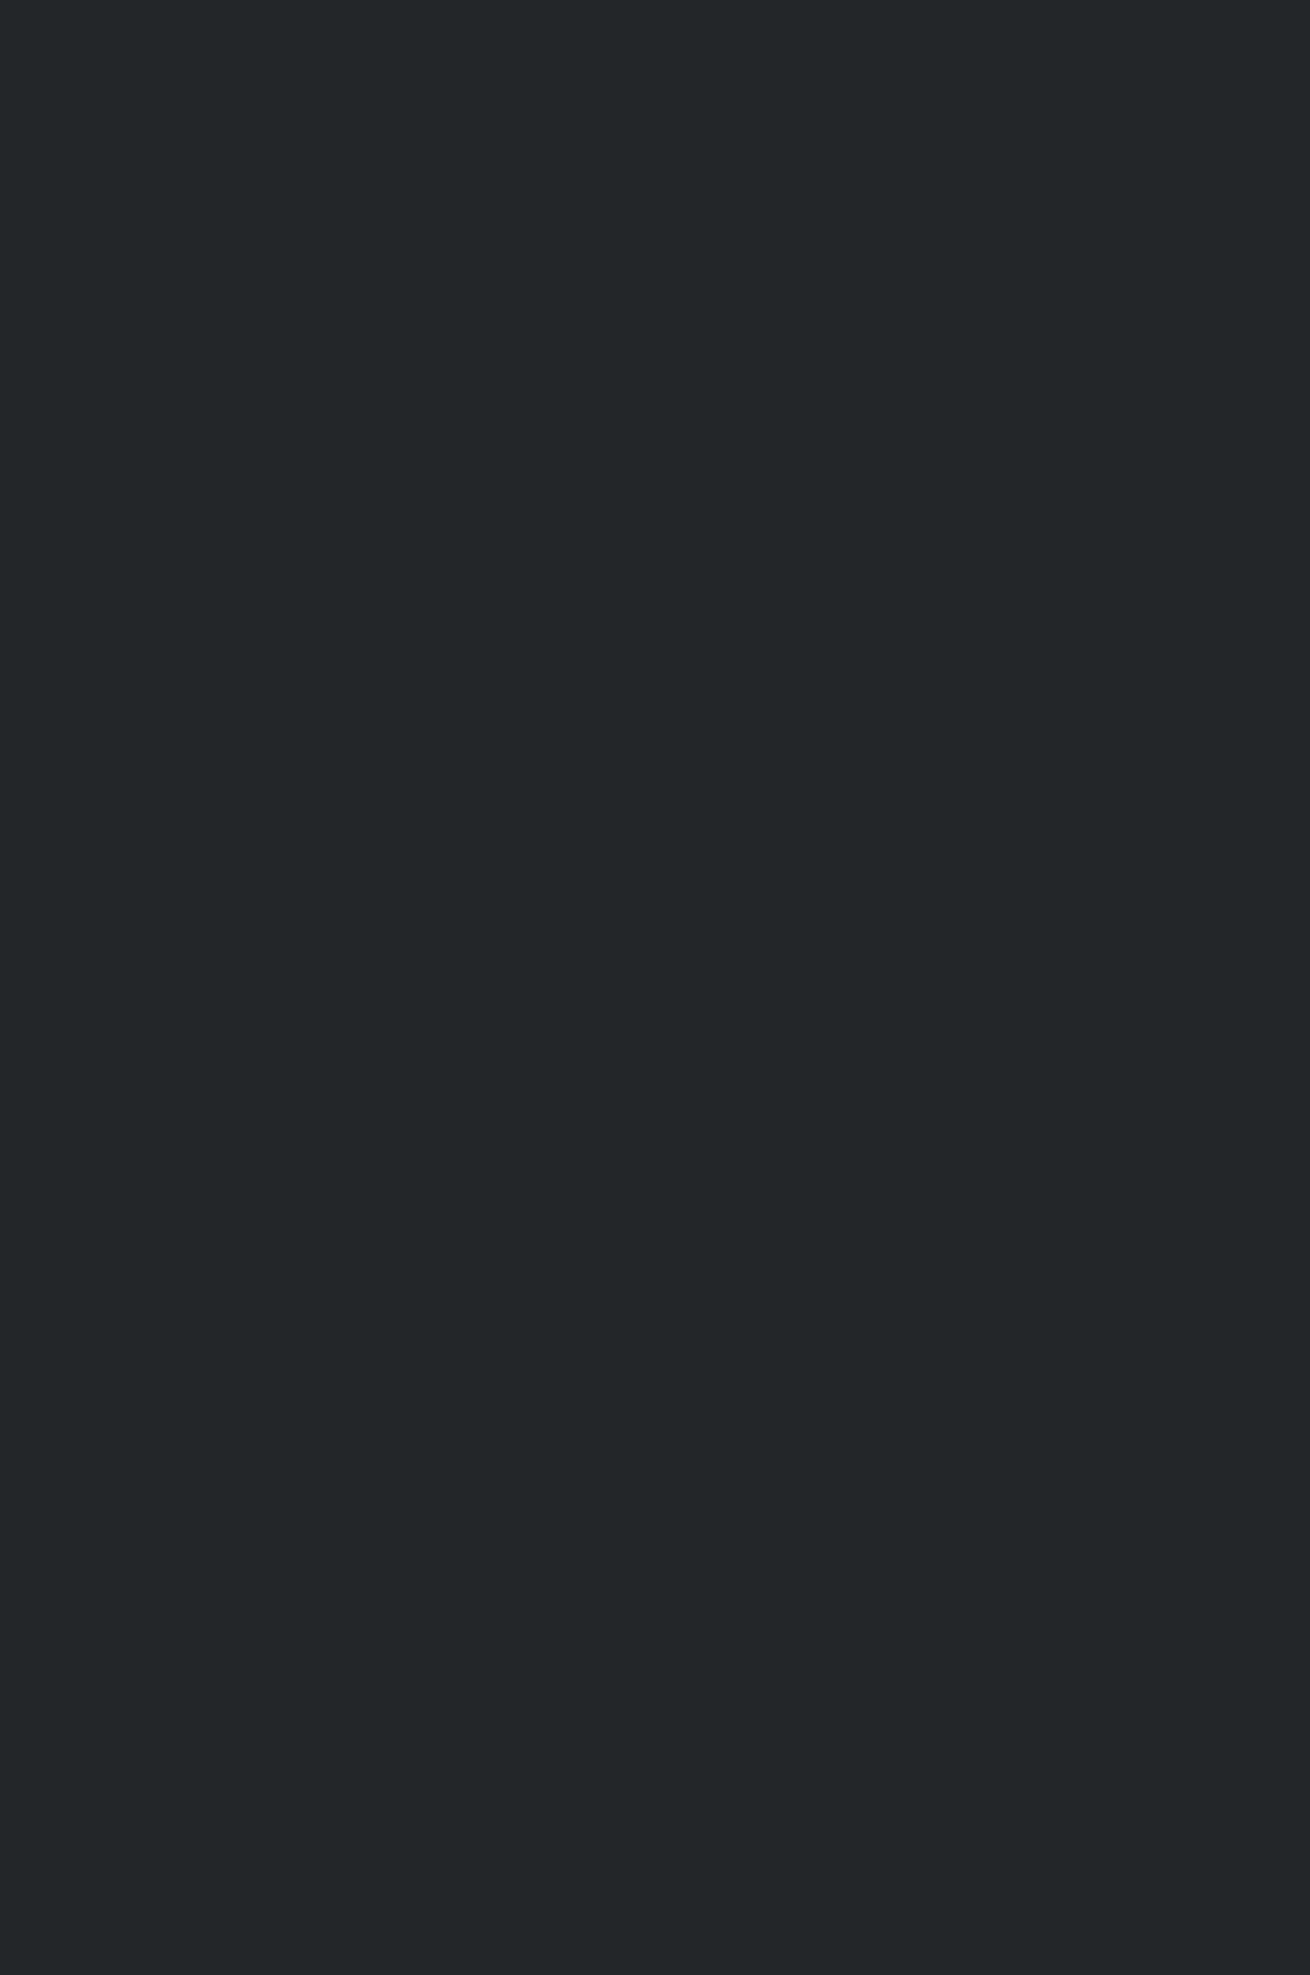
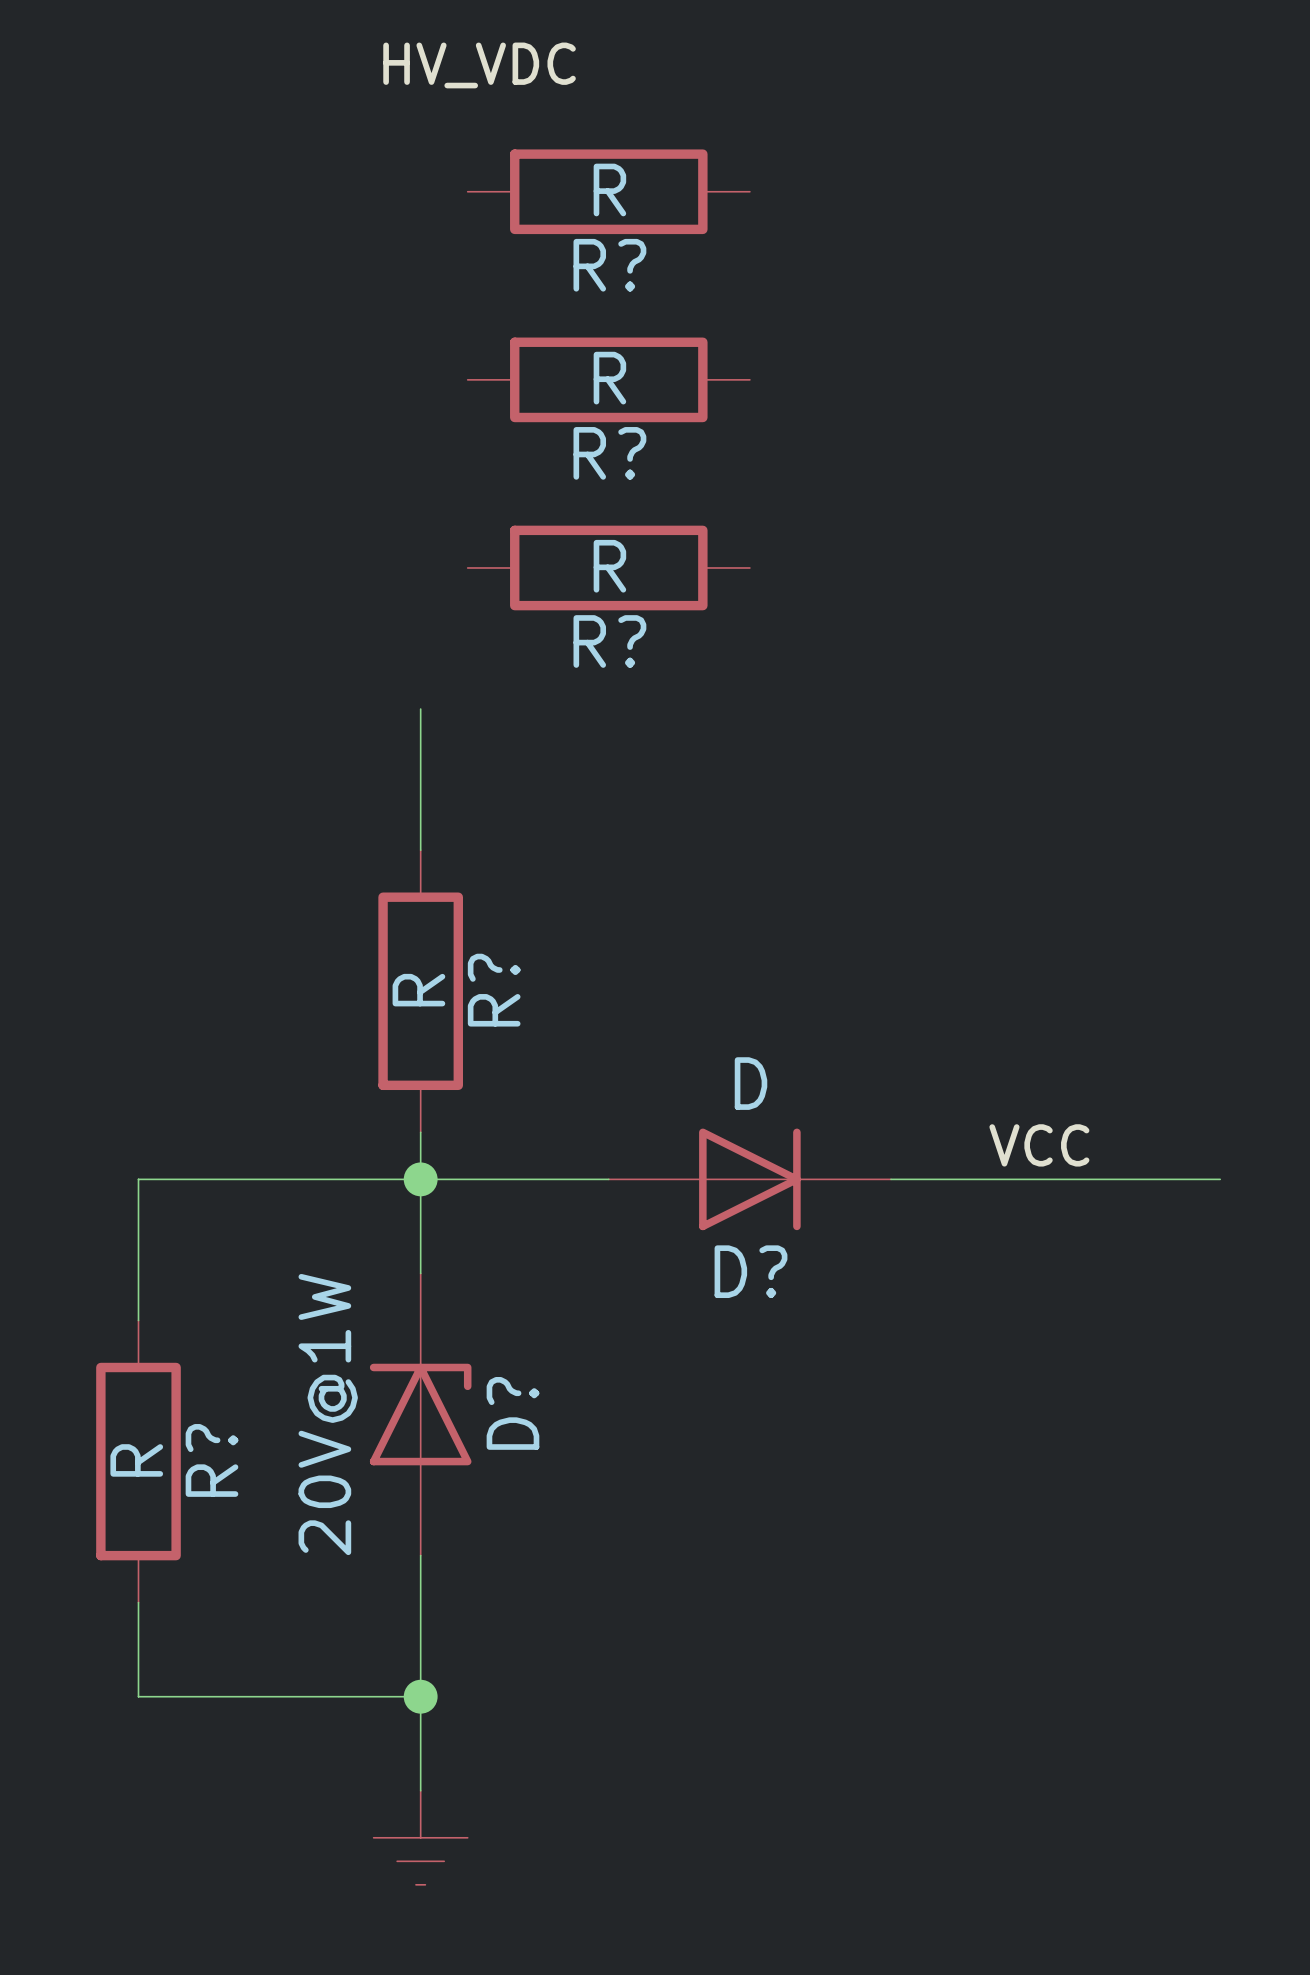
label: none -> HV_VDC (479, 65)
R?: none -> R (608, 191)
R?: none -> R (608, 379)
R?: none -> R (608, 567)
wire: none -> (420, 709) (420, 850)
R?: none -> R (420, 991)
wire: none -> (420, 1132) (420, 1273)
label: none -> VCC (1039, 1145)
junction: none -> (420, 1179)
wire: none -> (608, 1179) (138, 1179) (138, 1320)
D?: none -> D (749, 1179)
wire: none -> (890, 1179) (1220, 1179)
D?: none -> 20V@1W (420, 1414)
R?: none -> R (138, 1461)
wire: none -> (420, 1555) (420, 1790)
wire: none -> (138, 1602) (138, 1696) (420, 1696)
junction: none -> (420, 1696)
power symbol: none -> (420, 1837)

